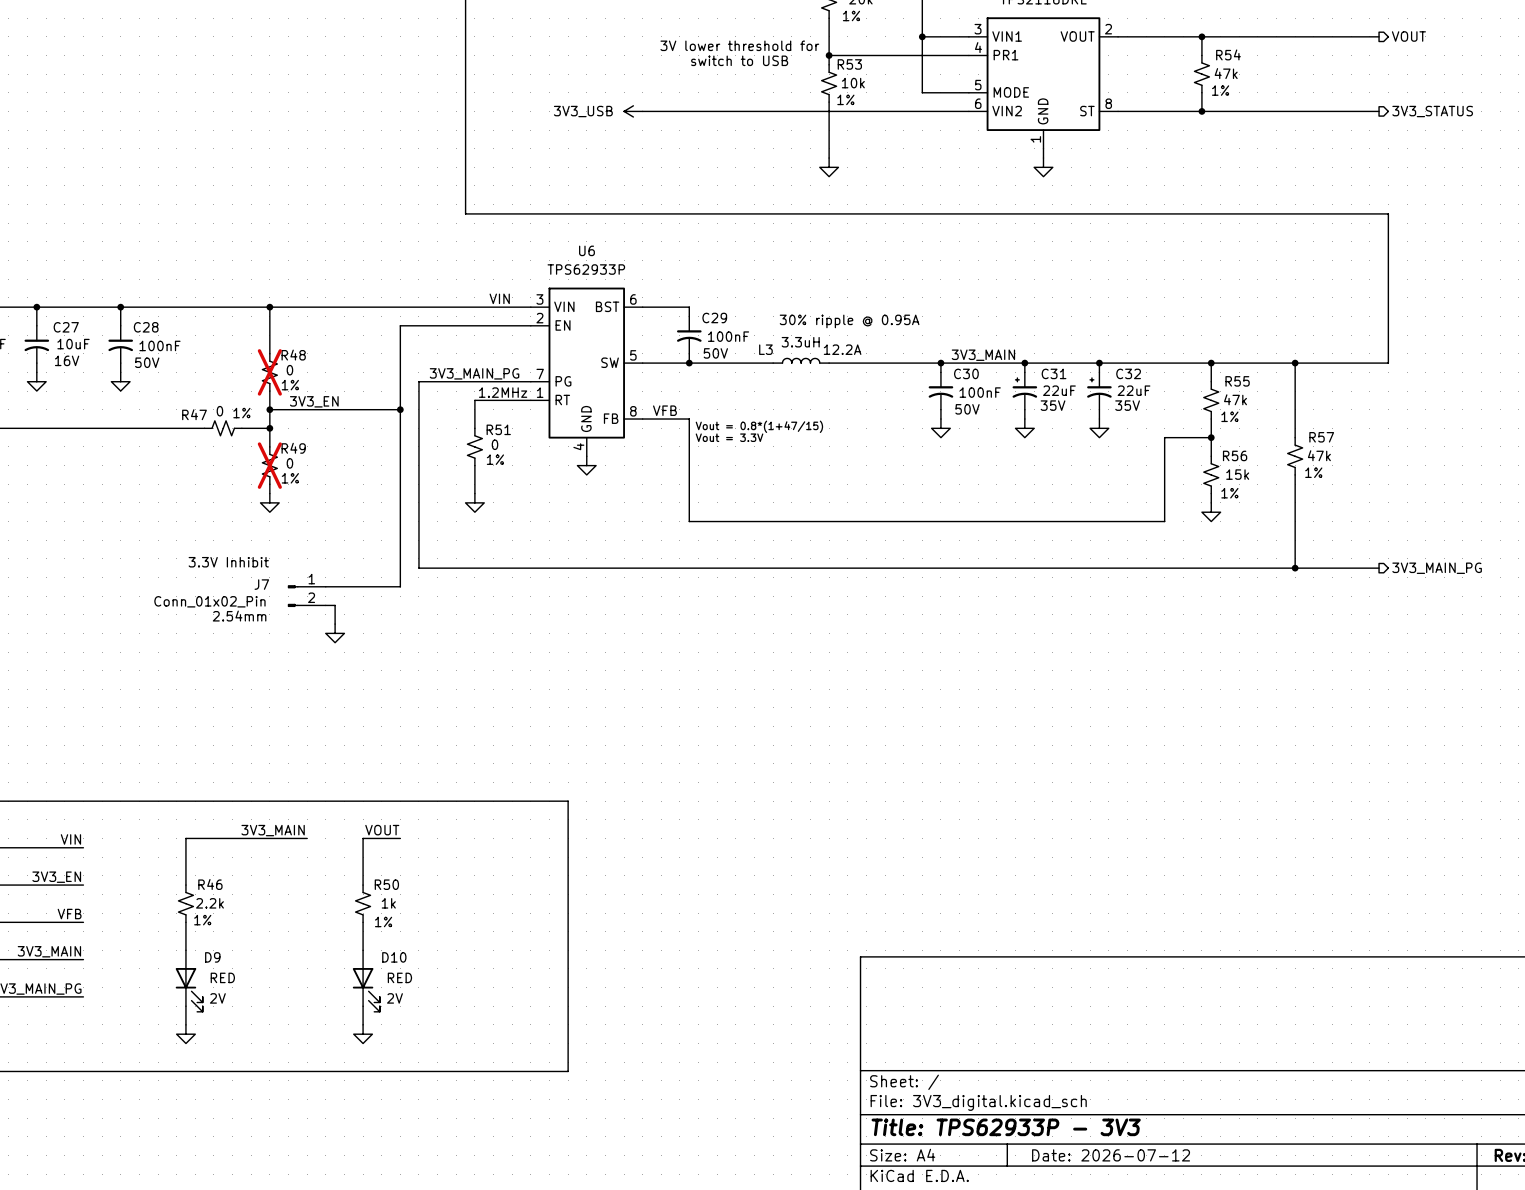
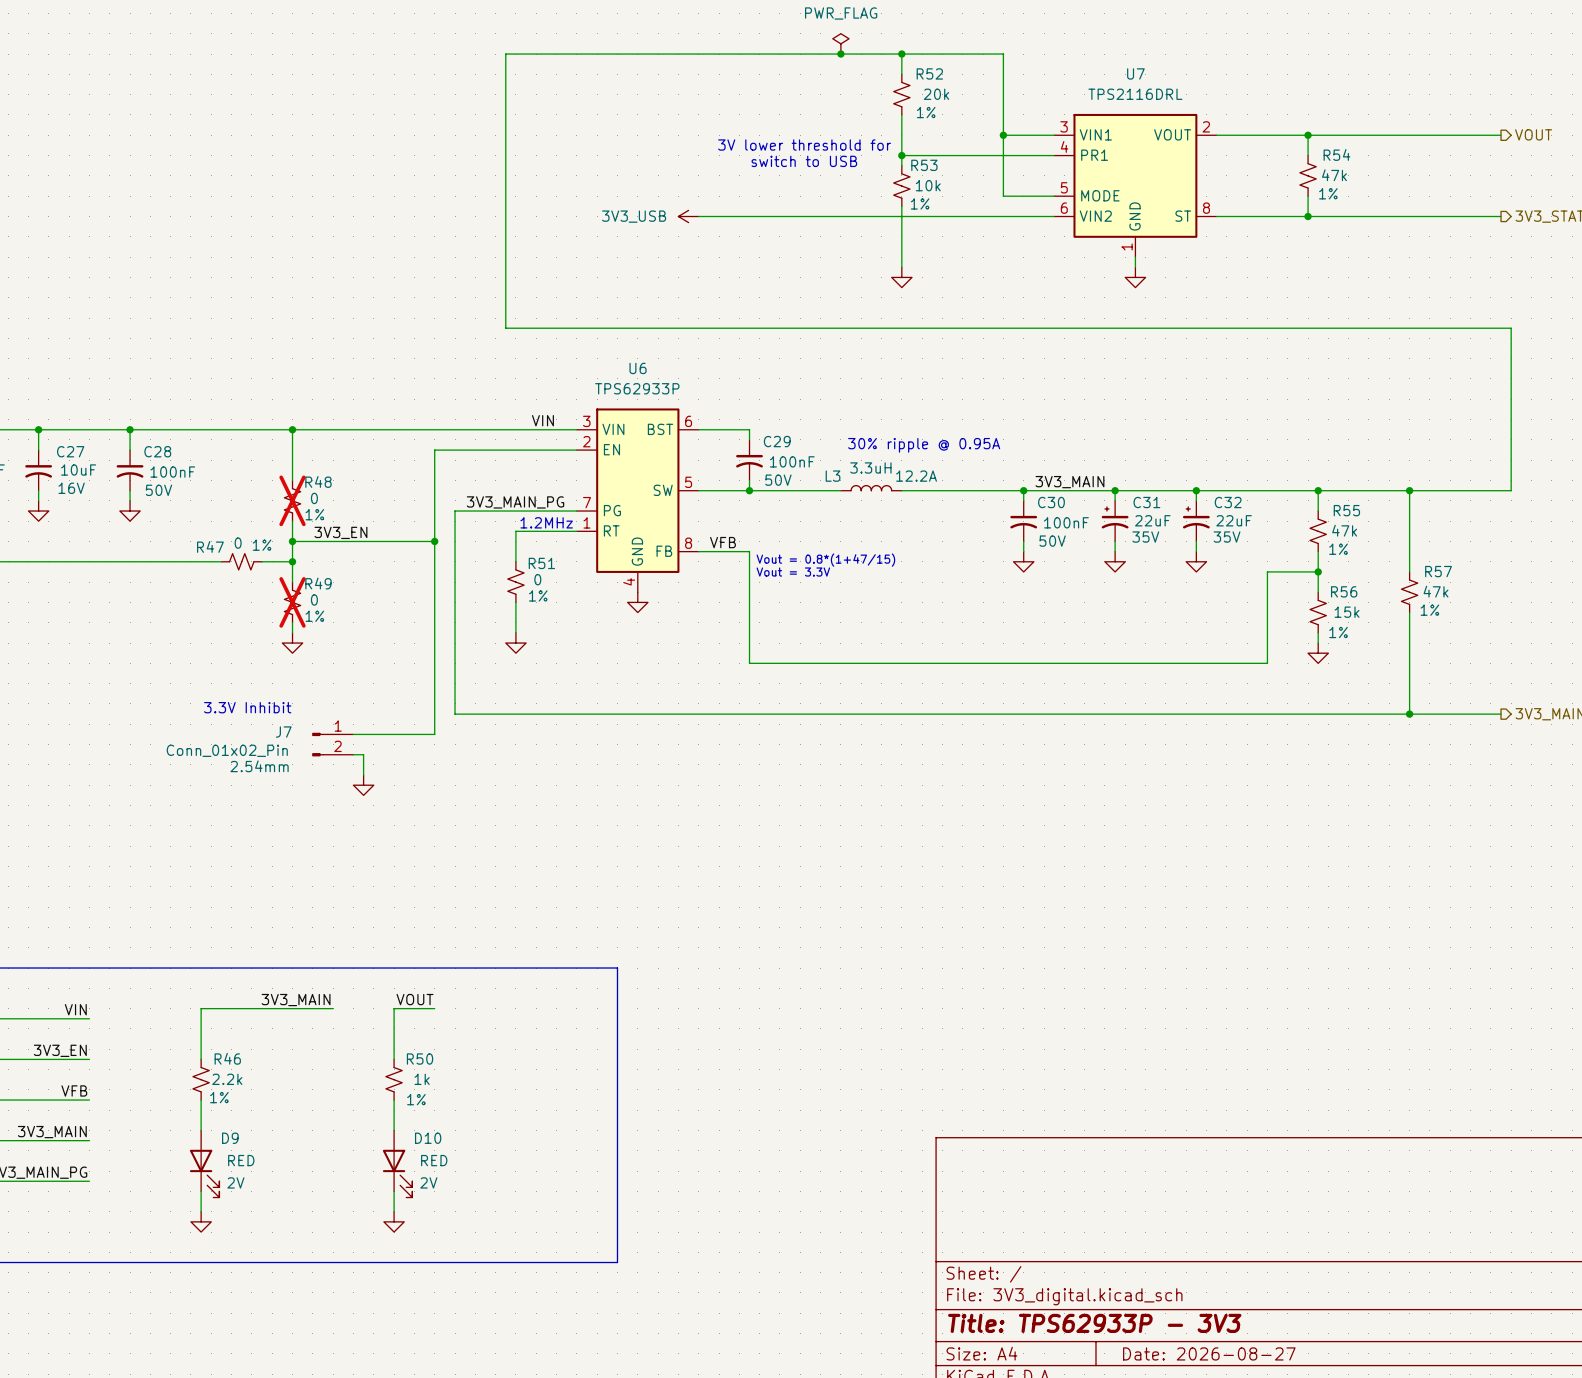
title block: Date: 2026-07-12 (1111, 1155) -> Date: 2026-08-27 (1209, 1353)

